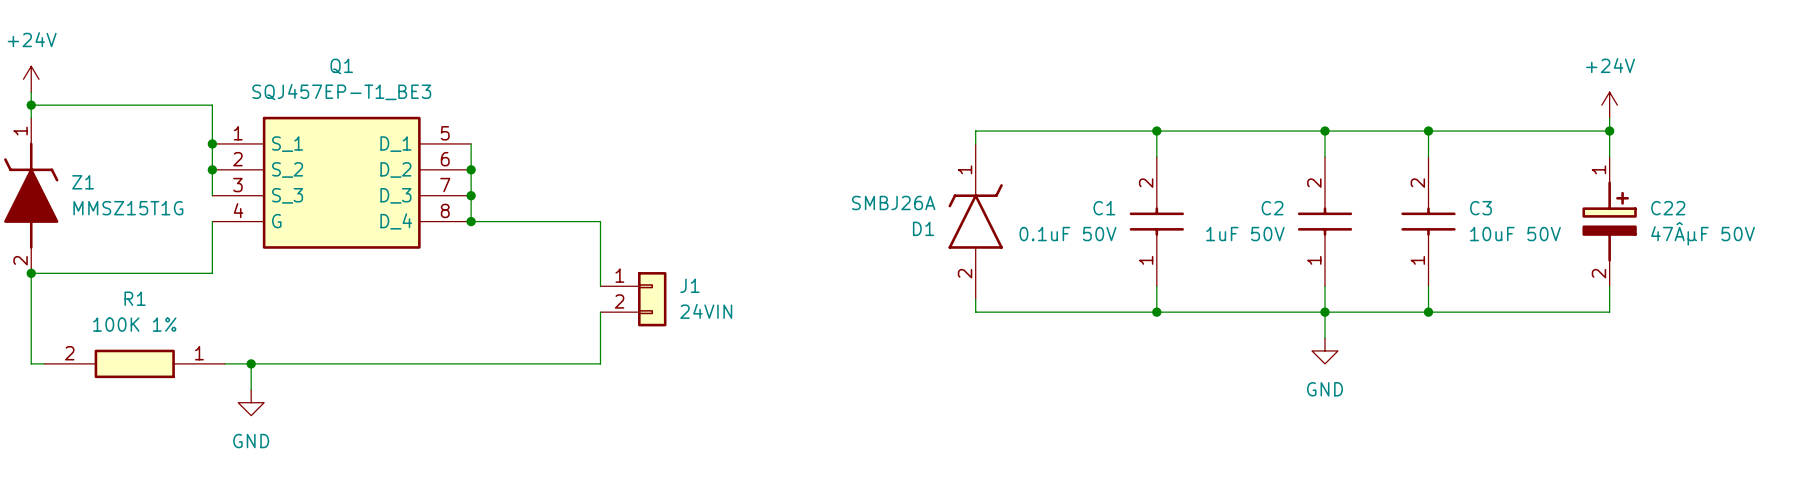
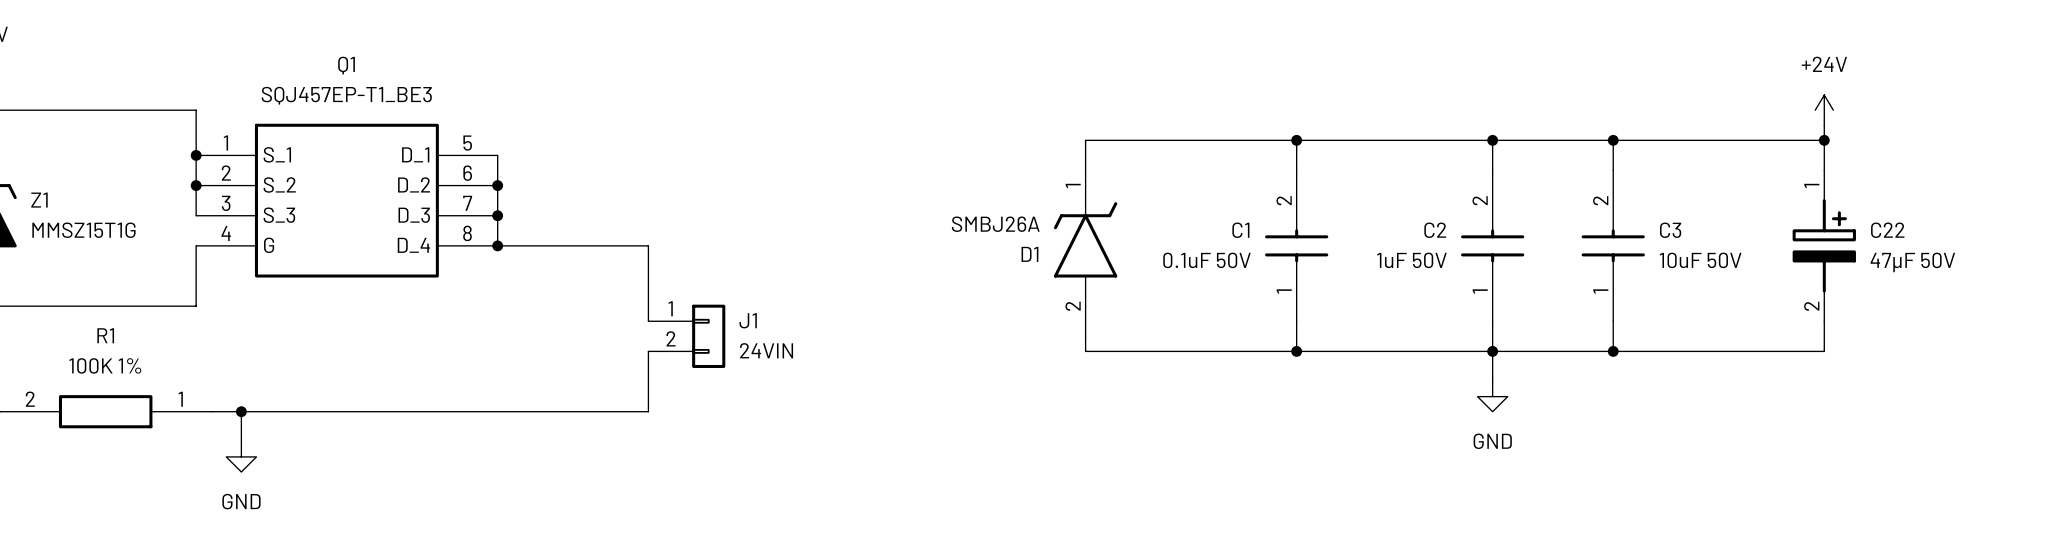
C22 value: 47ÂµF 50V (1703, 233) -> 47µF 50V (1912, 262)

